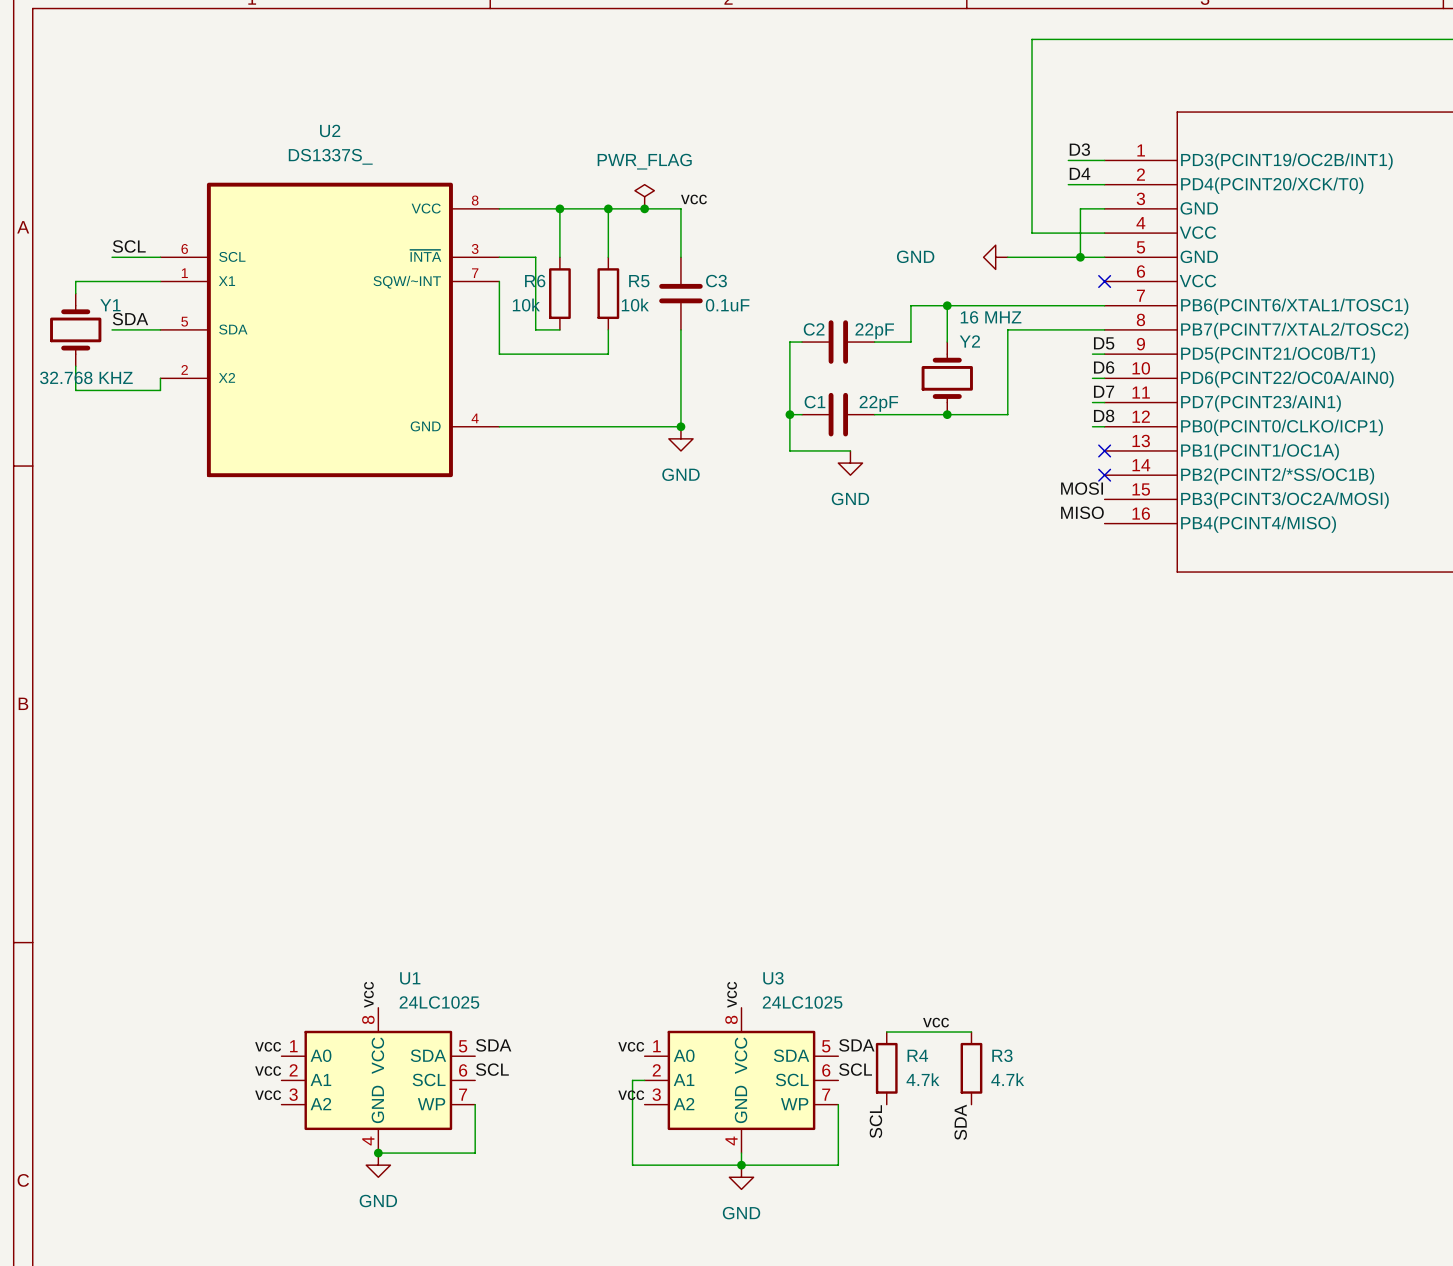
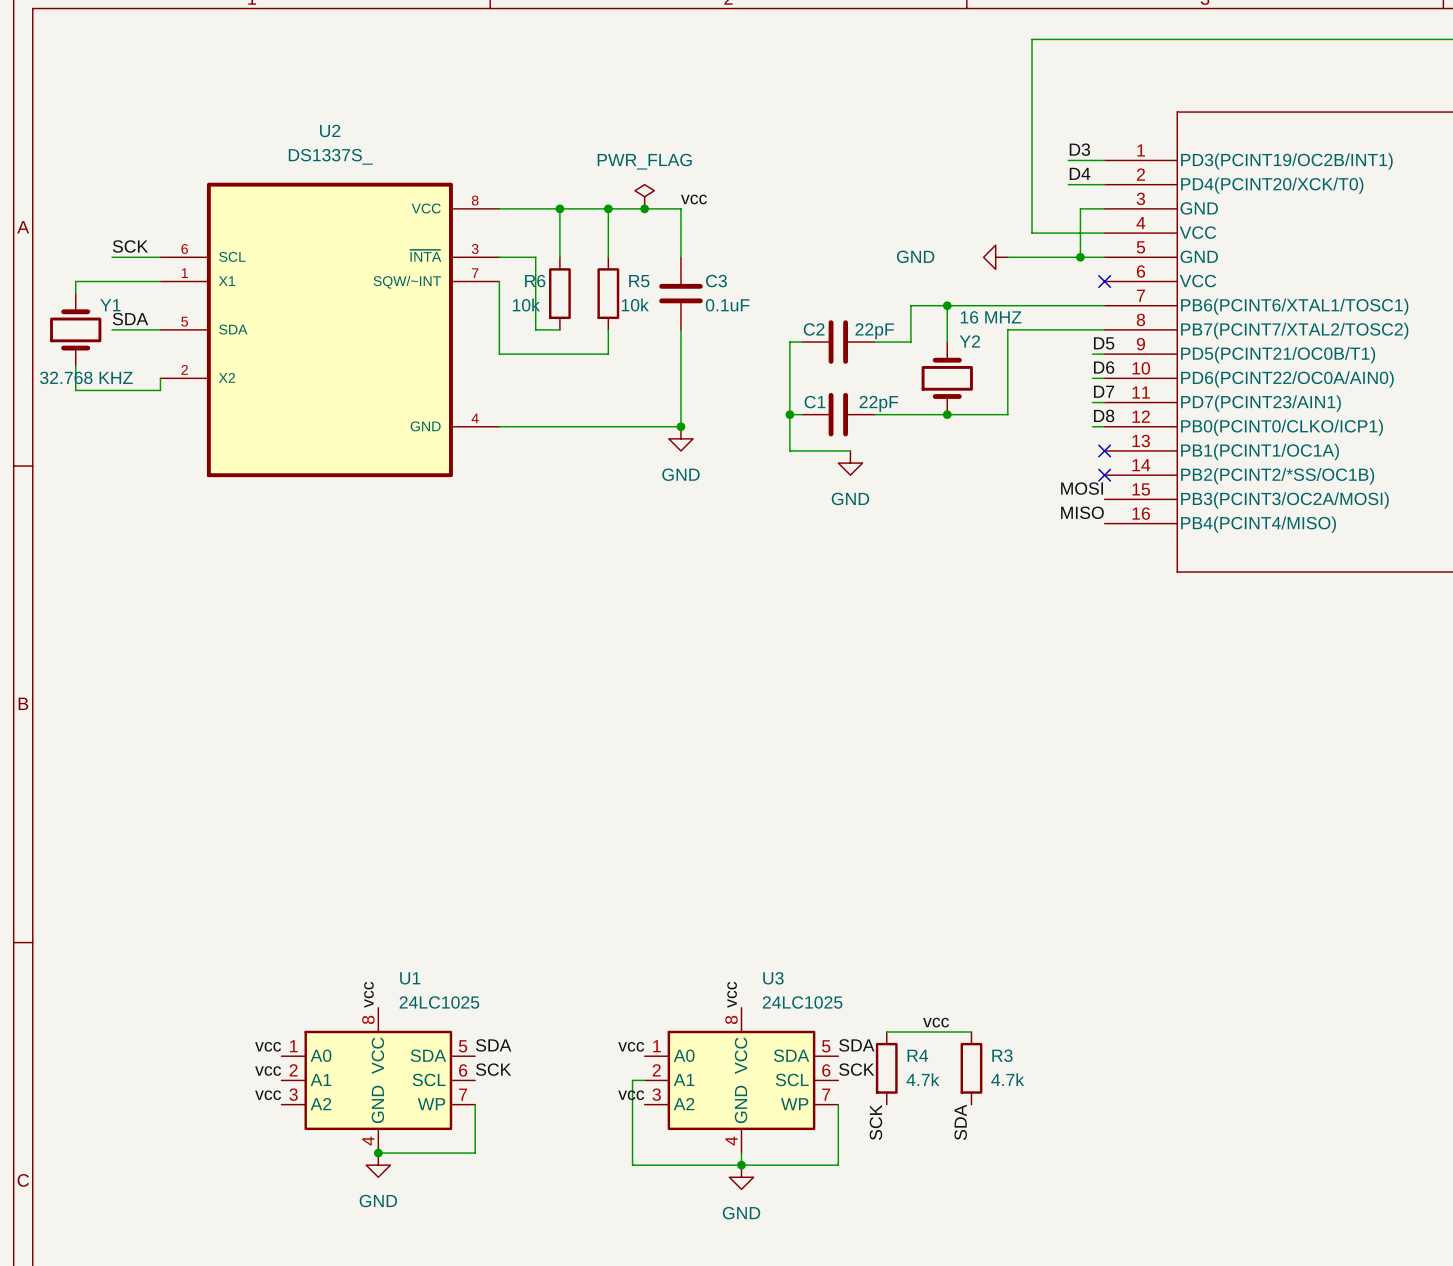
label: SCL (129, 246) -> SCK (130, 246)
label: SCL (492, 1069) -> SCK (493, 1069)
label: SCL (855, 1069) -> SCK (856, 1069)
label: SCL (875, 1121) -> SCK (875, 1122)

